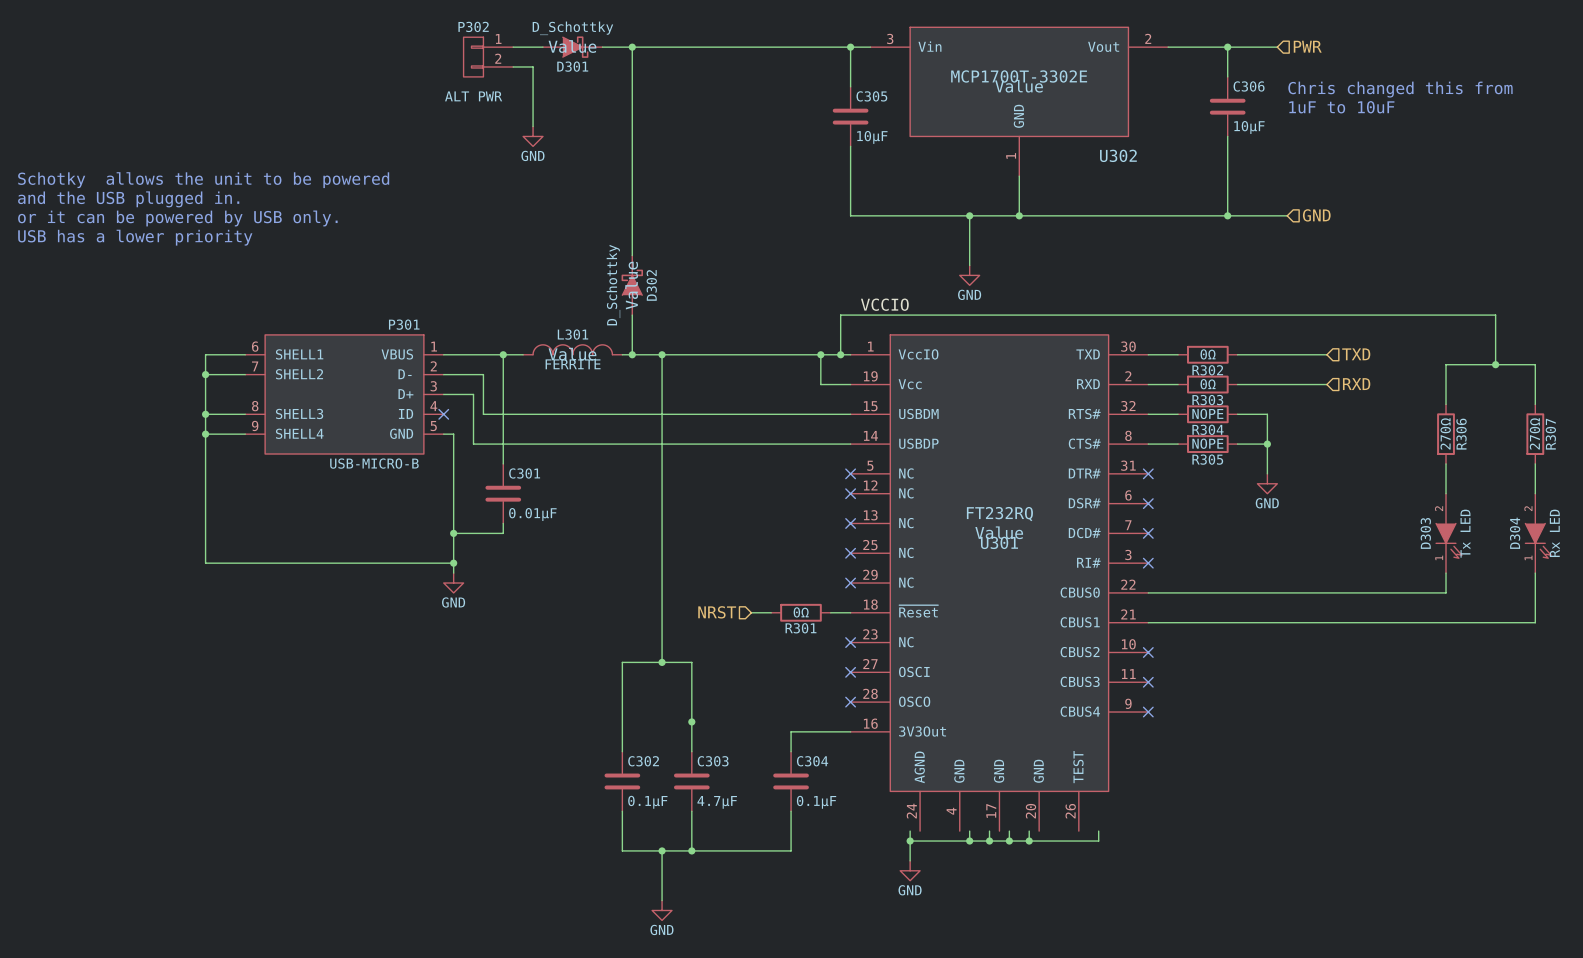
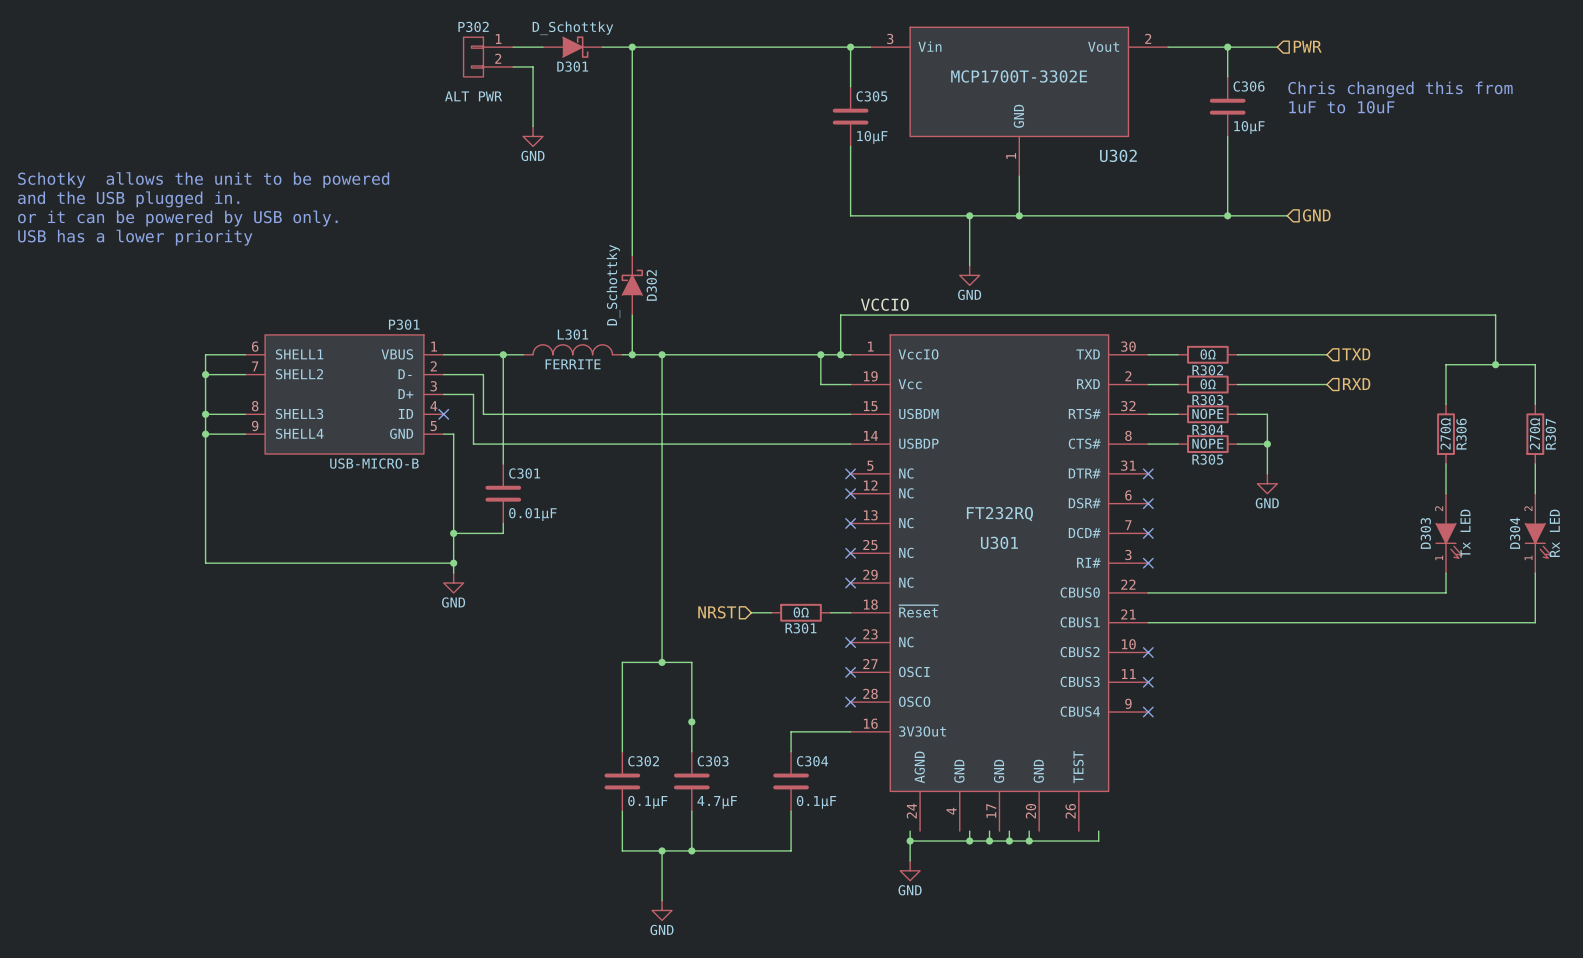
D301 text: Value (572, 46) -> none
U302 text: Value (1019, 86) -> none
D302 text: Value (631, 285) -> none
L301 text: Value (572, 354) -> none
U301 text: Value (999, 532) -> none

